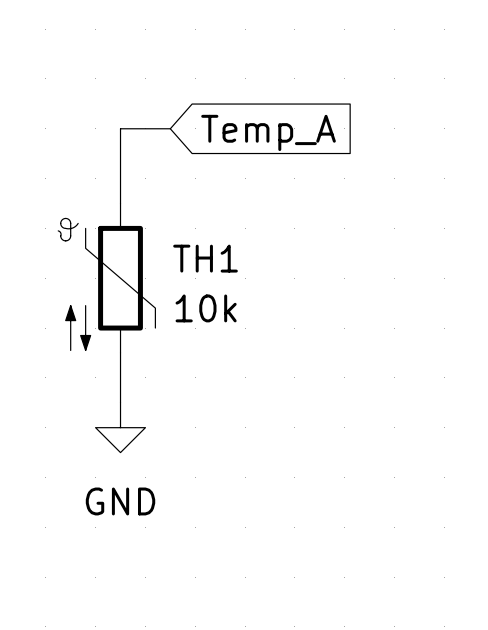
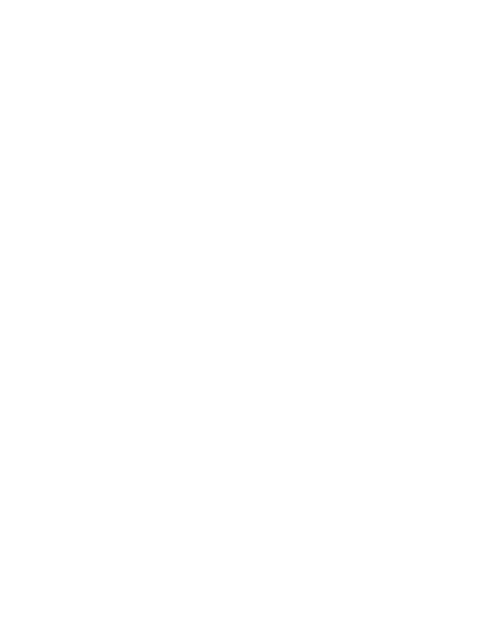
wire: (170, 128) (120, 128) (120, 203) -> none
global label: Temp_A (268, 132) -> none
TH1: 10k (106, 278) -> none
wire: (120, 352) (120, 402) -> none
power symbol: GND (120, 427) -> none

